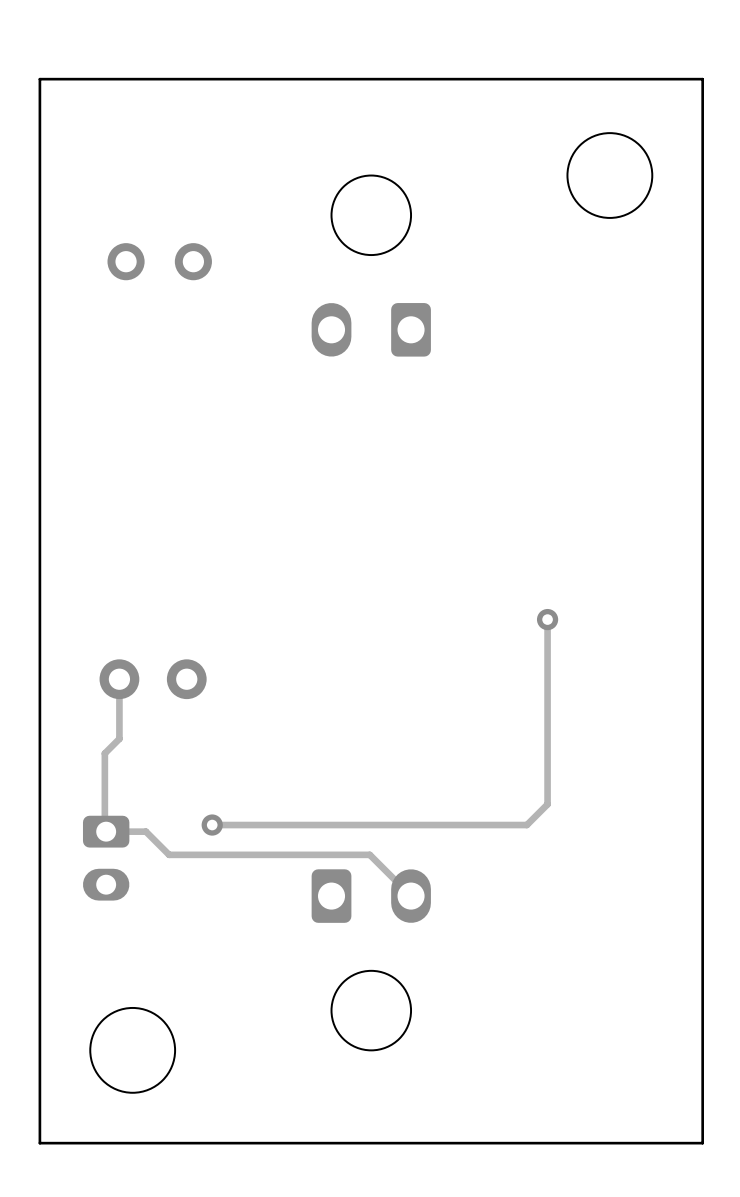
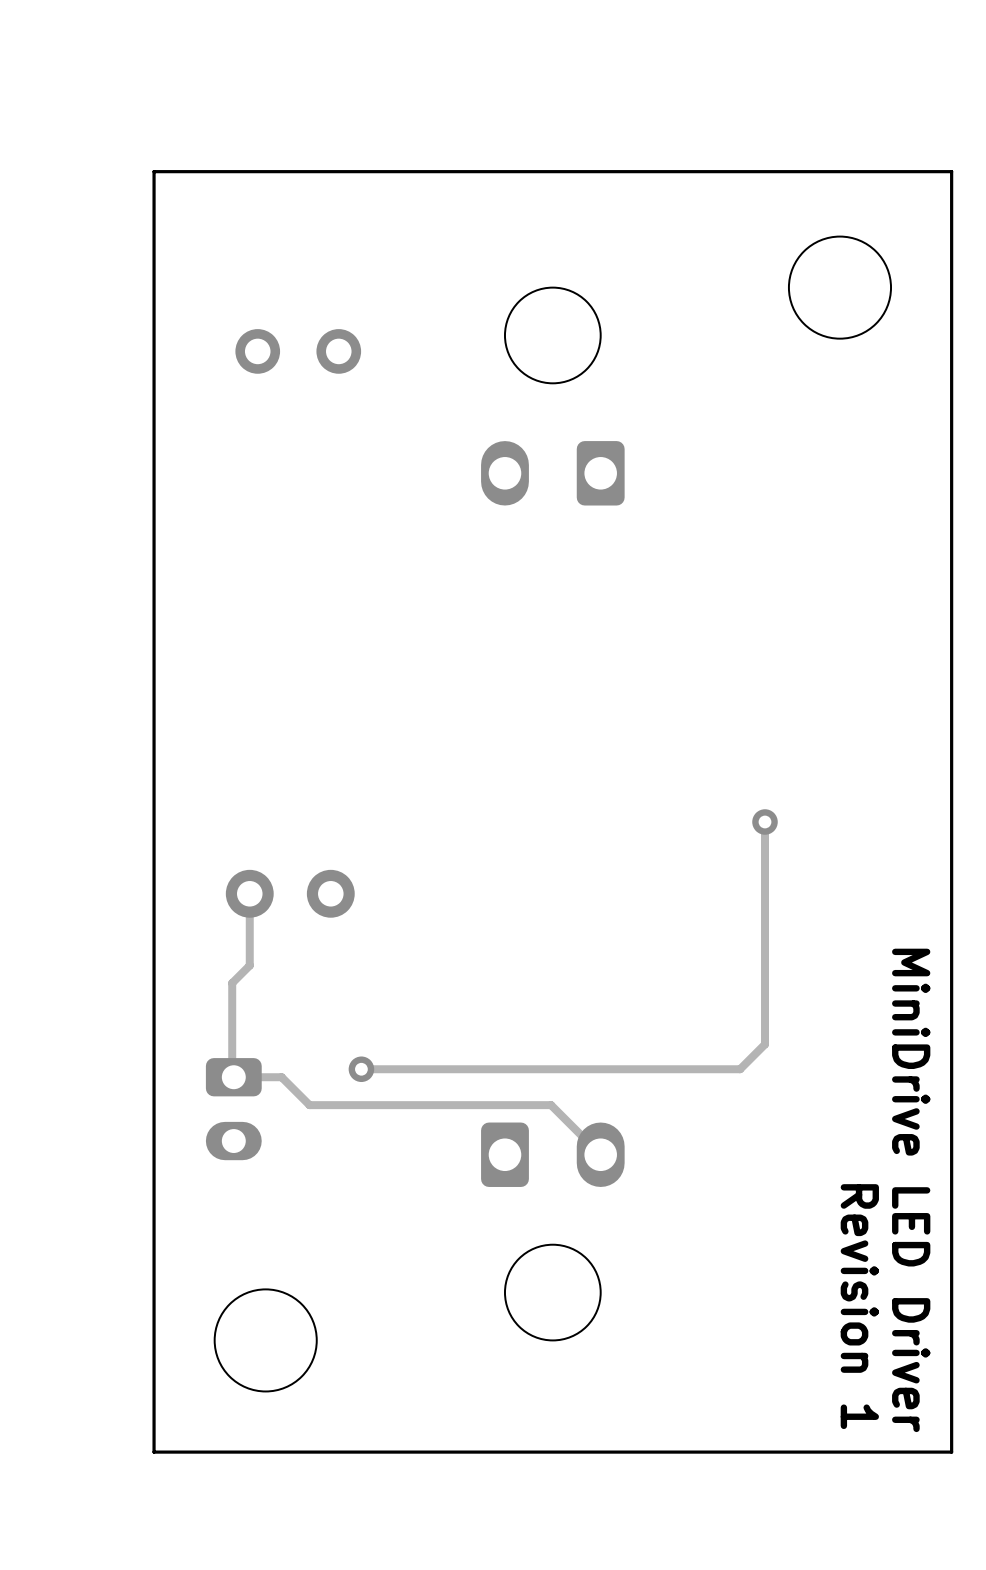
part position: (159, 261) -> (298, 351)
text: none -> MiniDrive LED Driver (911, 1190)
text: none -> Revision 1 (859, 1306)

